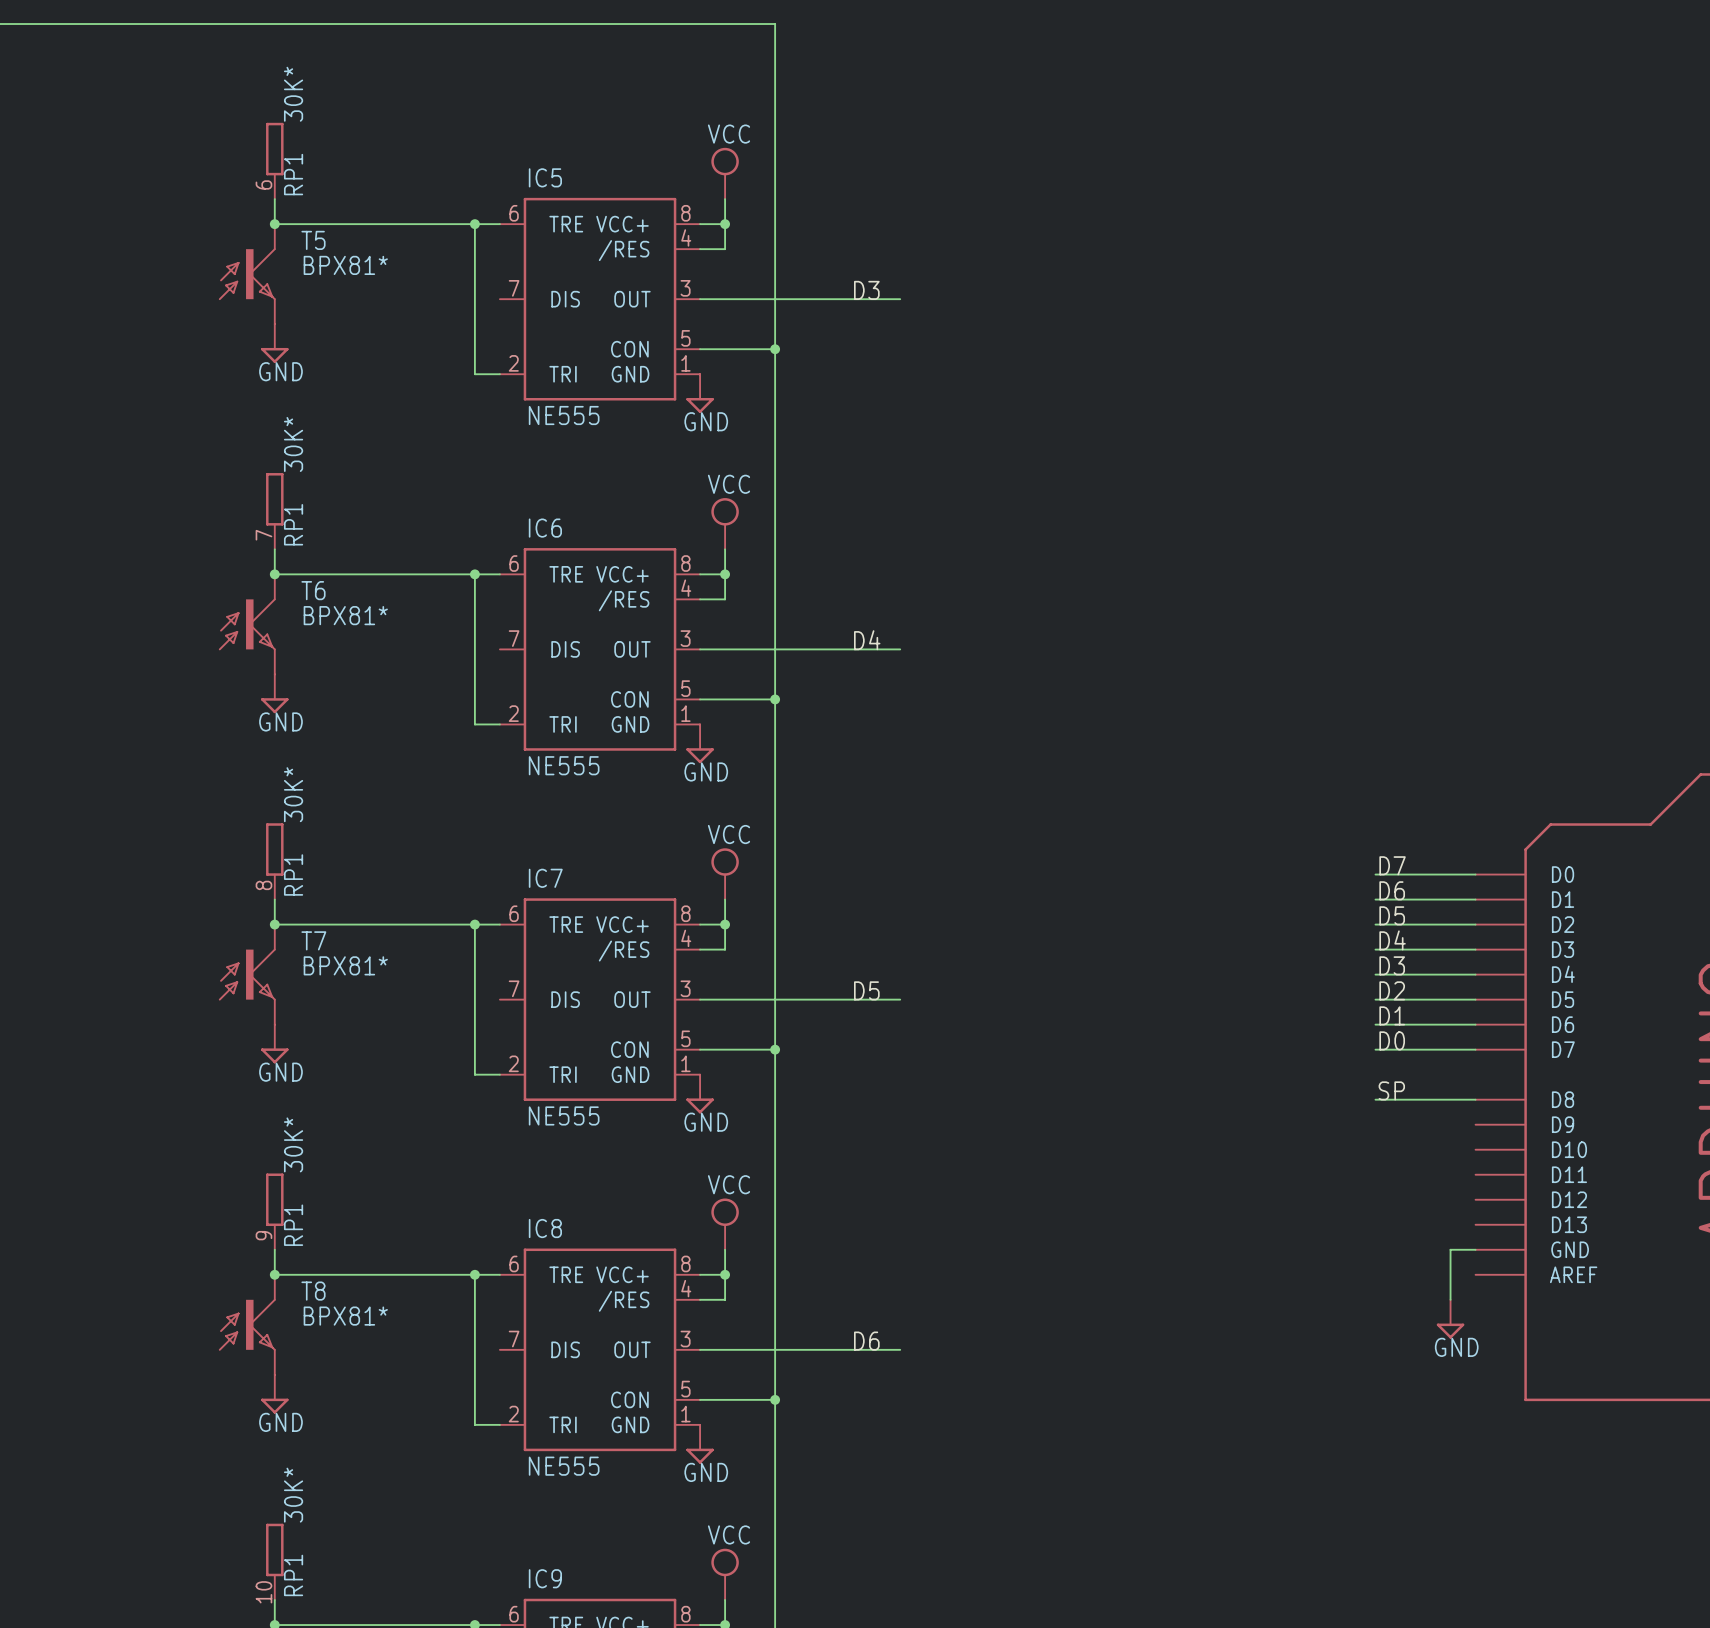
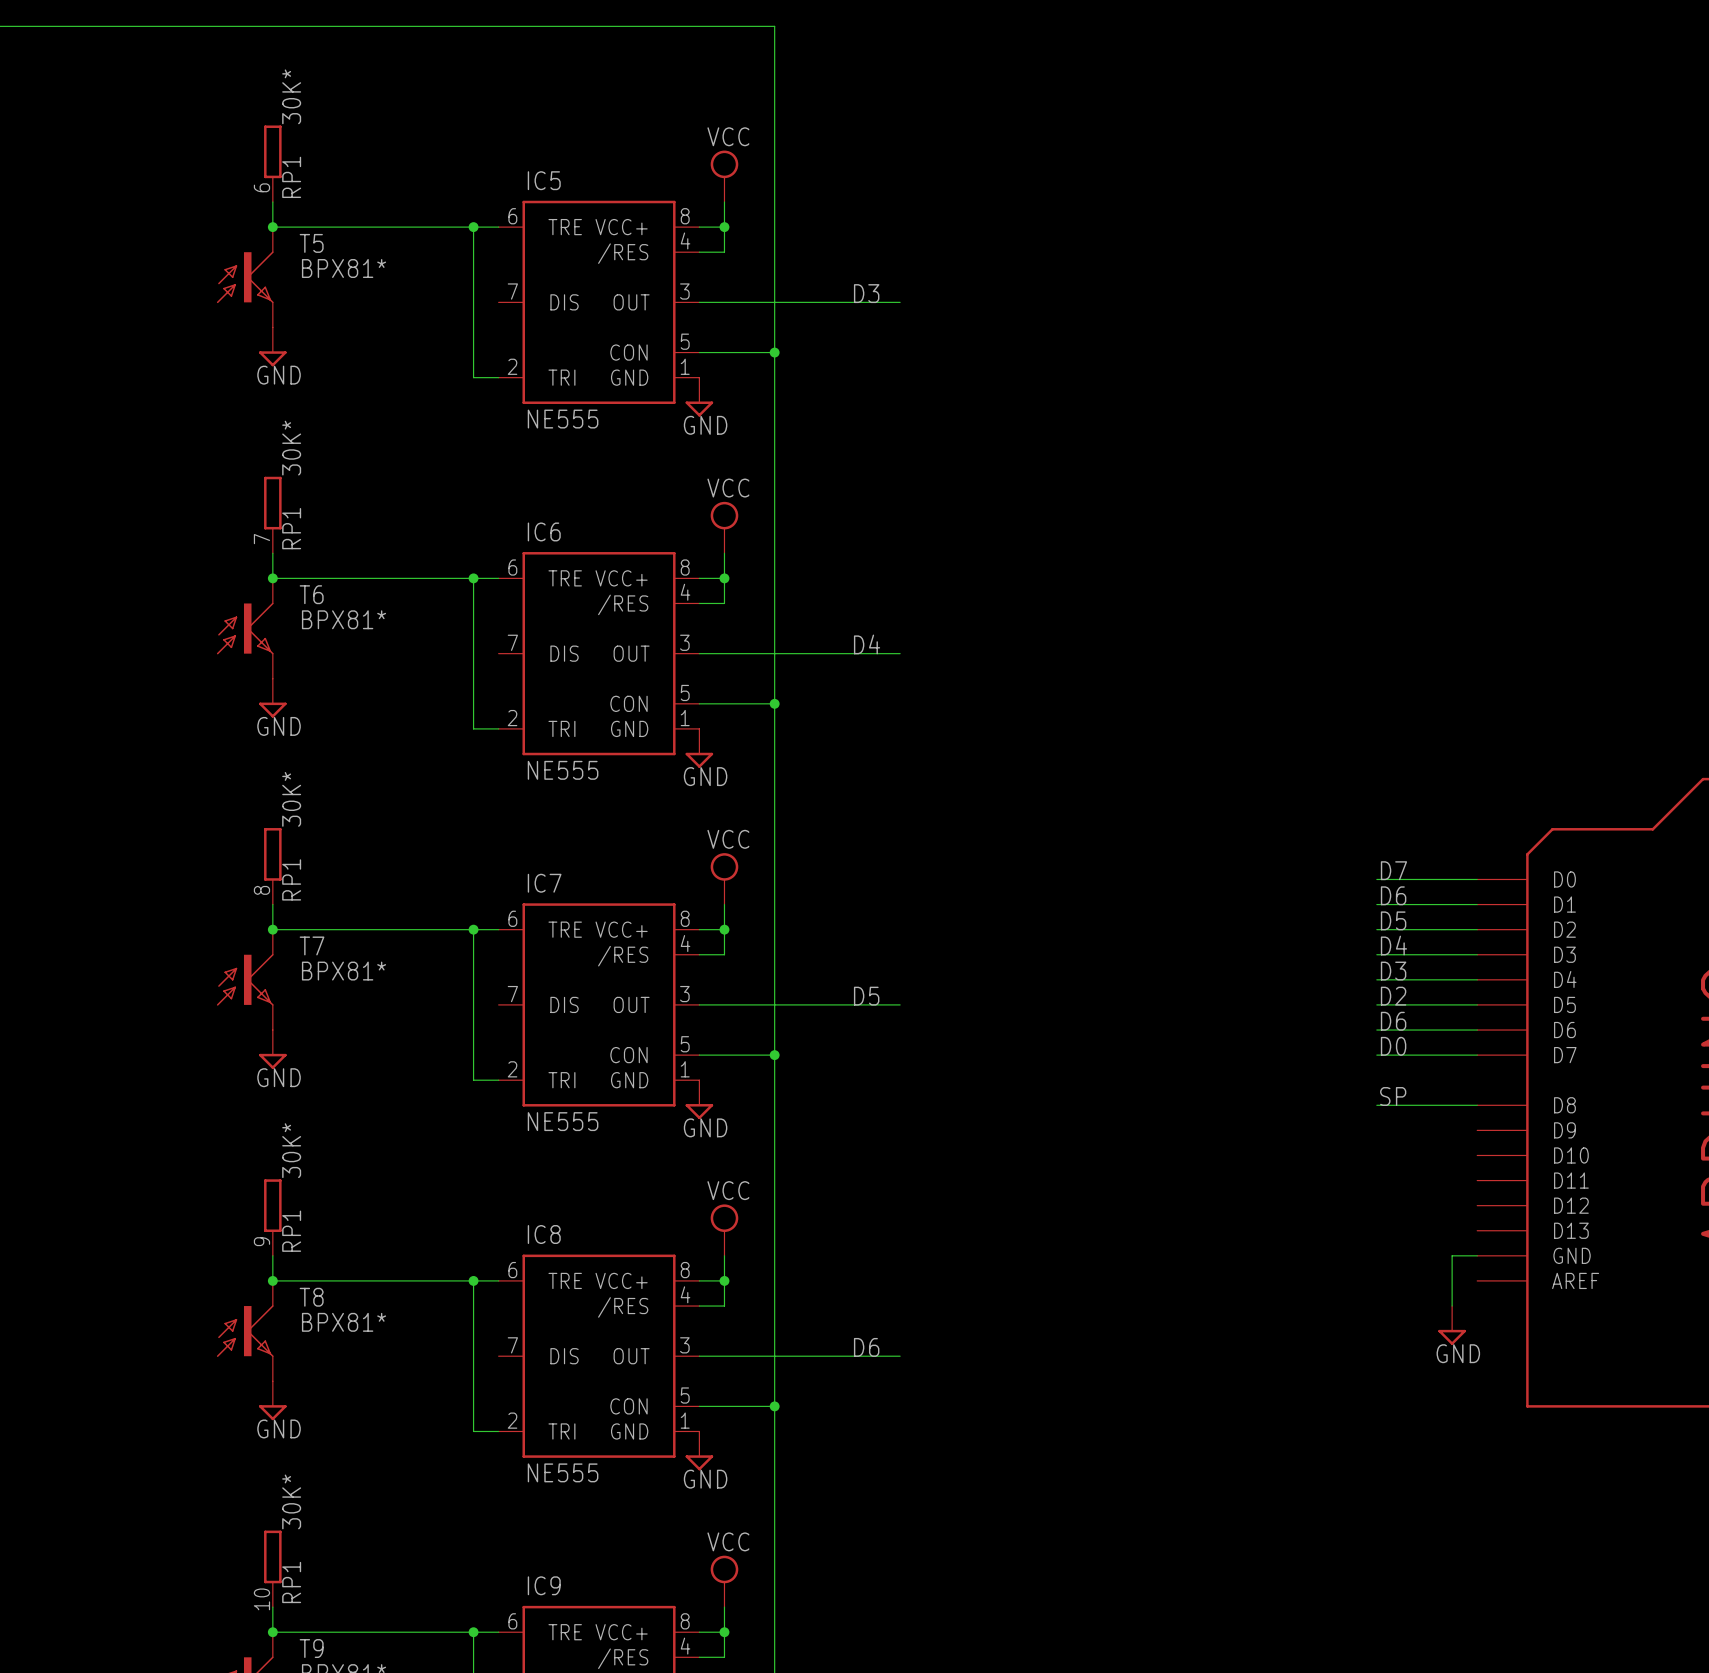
label: D1 (1392, 1015) -> D6 (1393, 1021)

